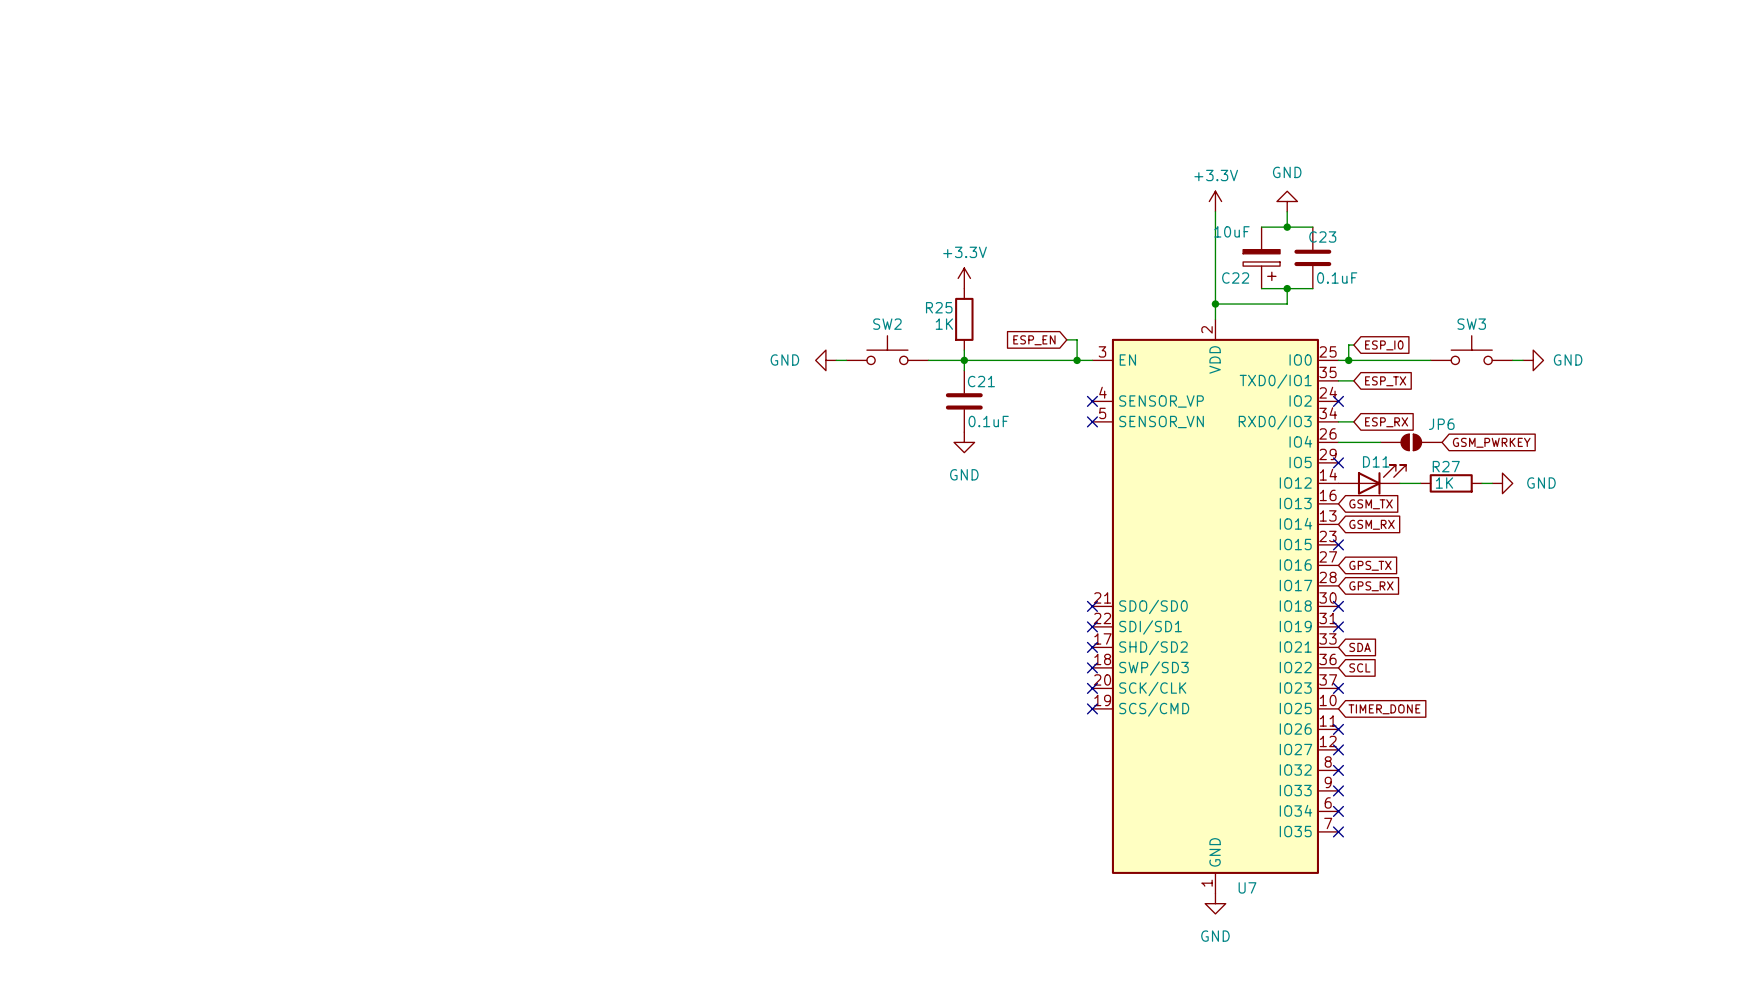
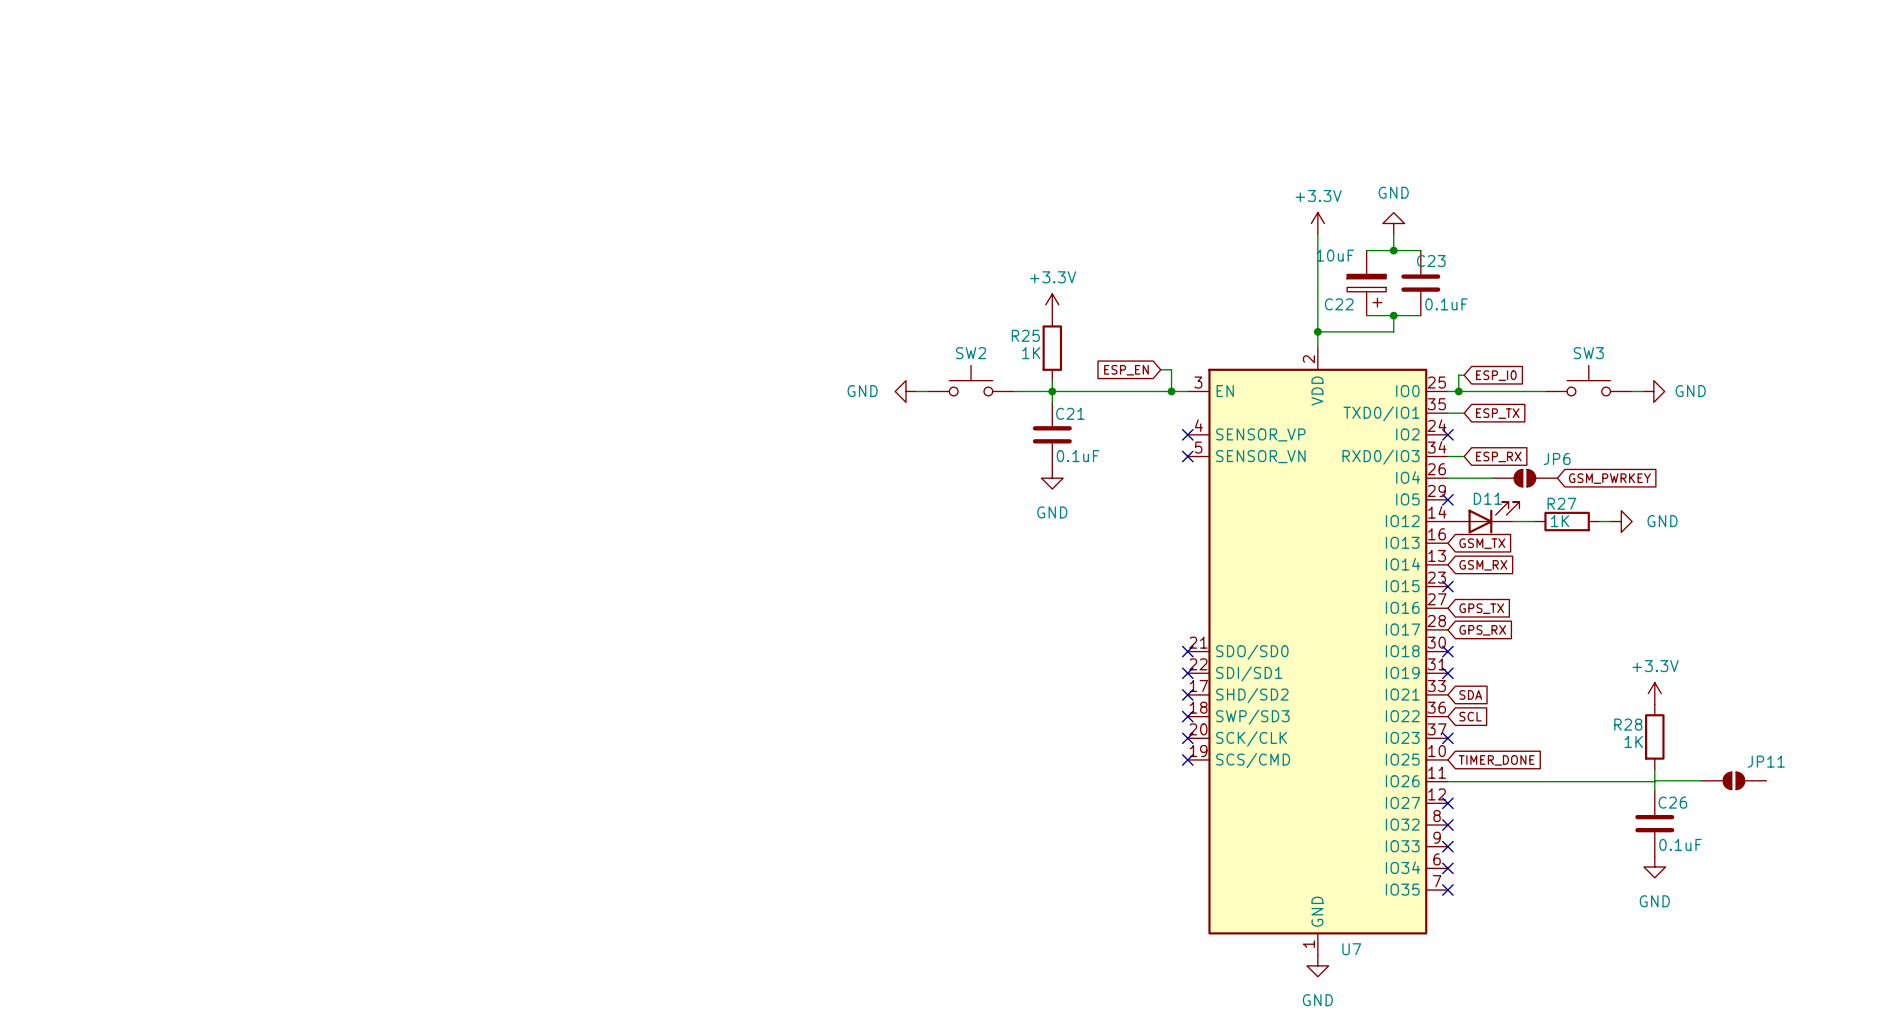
power symbol: none -> +3.3V (1654, 693)
R28: none -> 1K (1654, 736)
wire: none -> (1654, 769) (1654, 791)
wire: none -> (1654, 780) (1701, 780)
JP11: none -> (1733, 780)
wire: none -> (1447, 781) (1654, 781)
no-connect mark: (1338, 729) -> none
C26: none -> 0.1uF (1654, 823)
power symbol: none -> GND (1654, 866)

